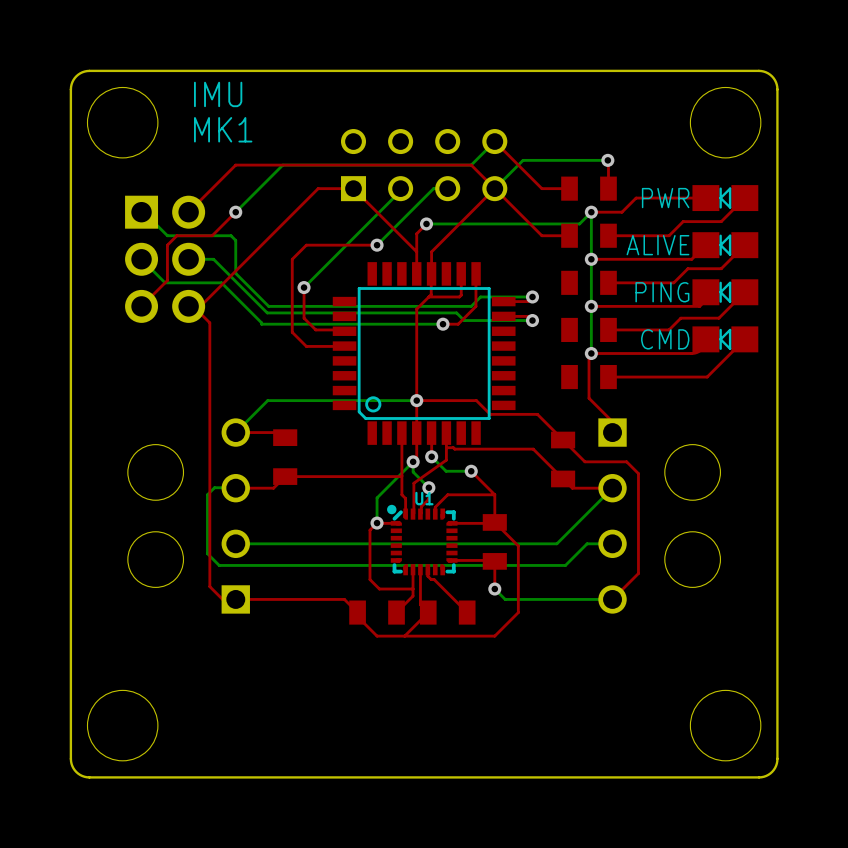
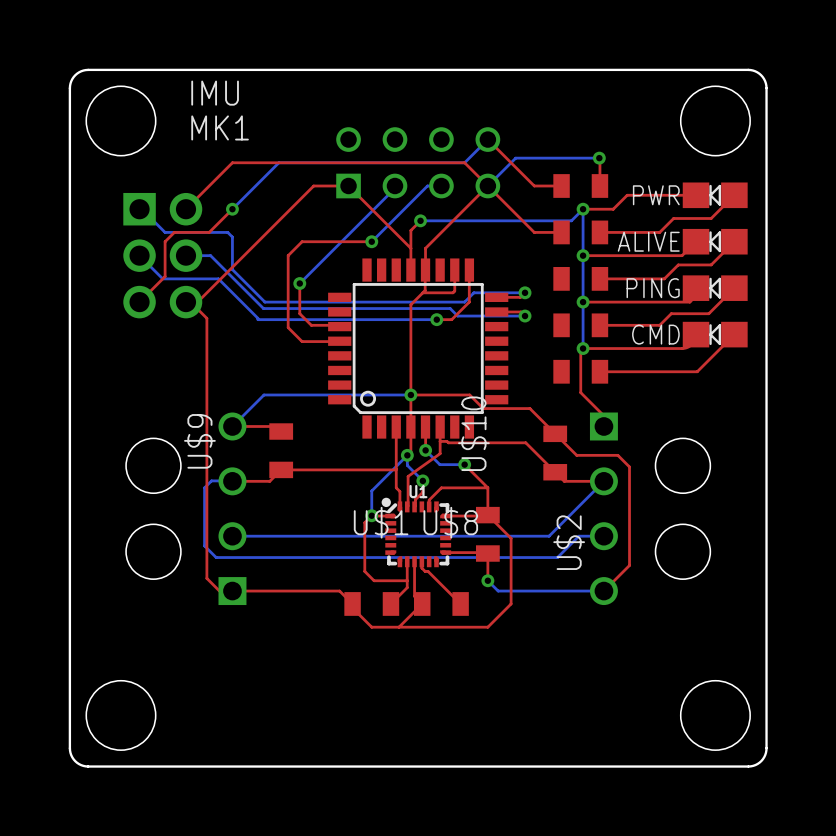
U$10 name: none -> U$10 (473, 433)
U$9 name: none -> U$9 (199, 441)
U$1 name: none -> U$1 (381, 522)
U$8 name: none -> U$8 (450, 522)
U$2 name: none -> U$2 (569, 542)

